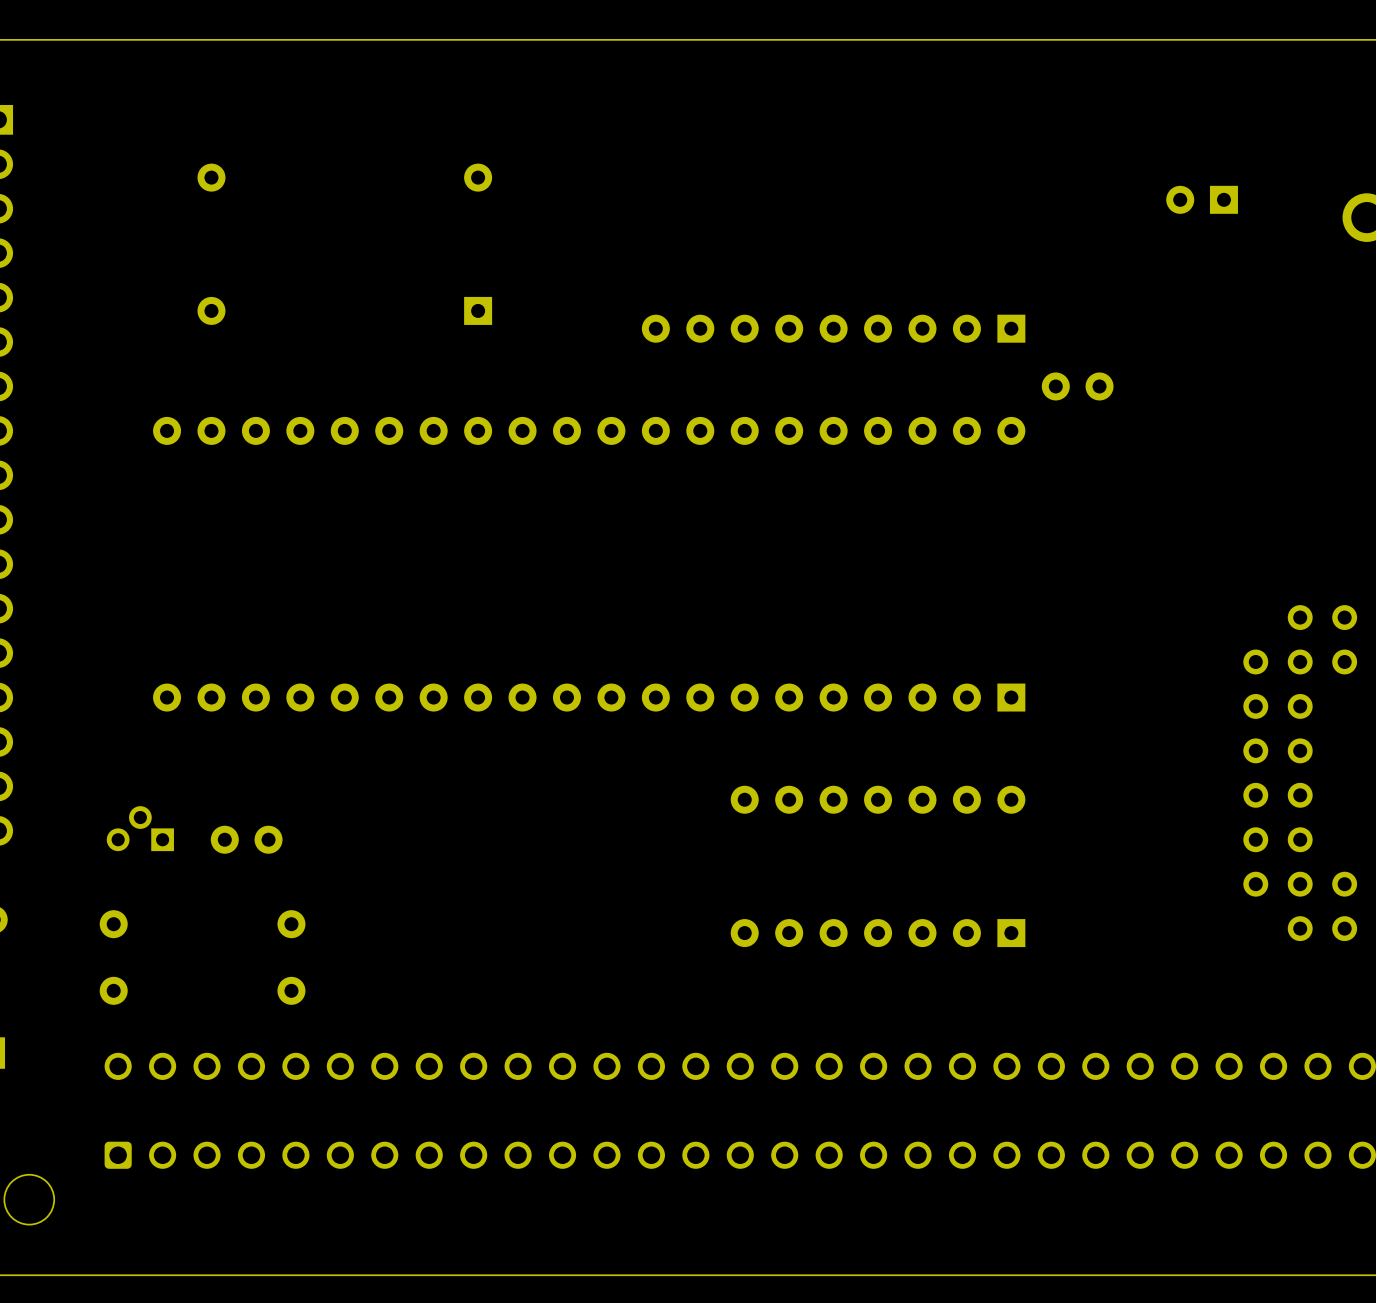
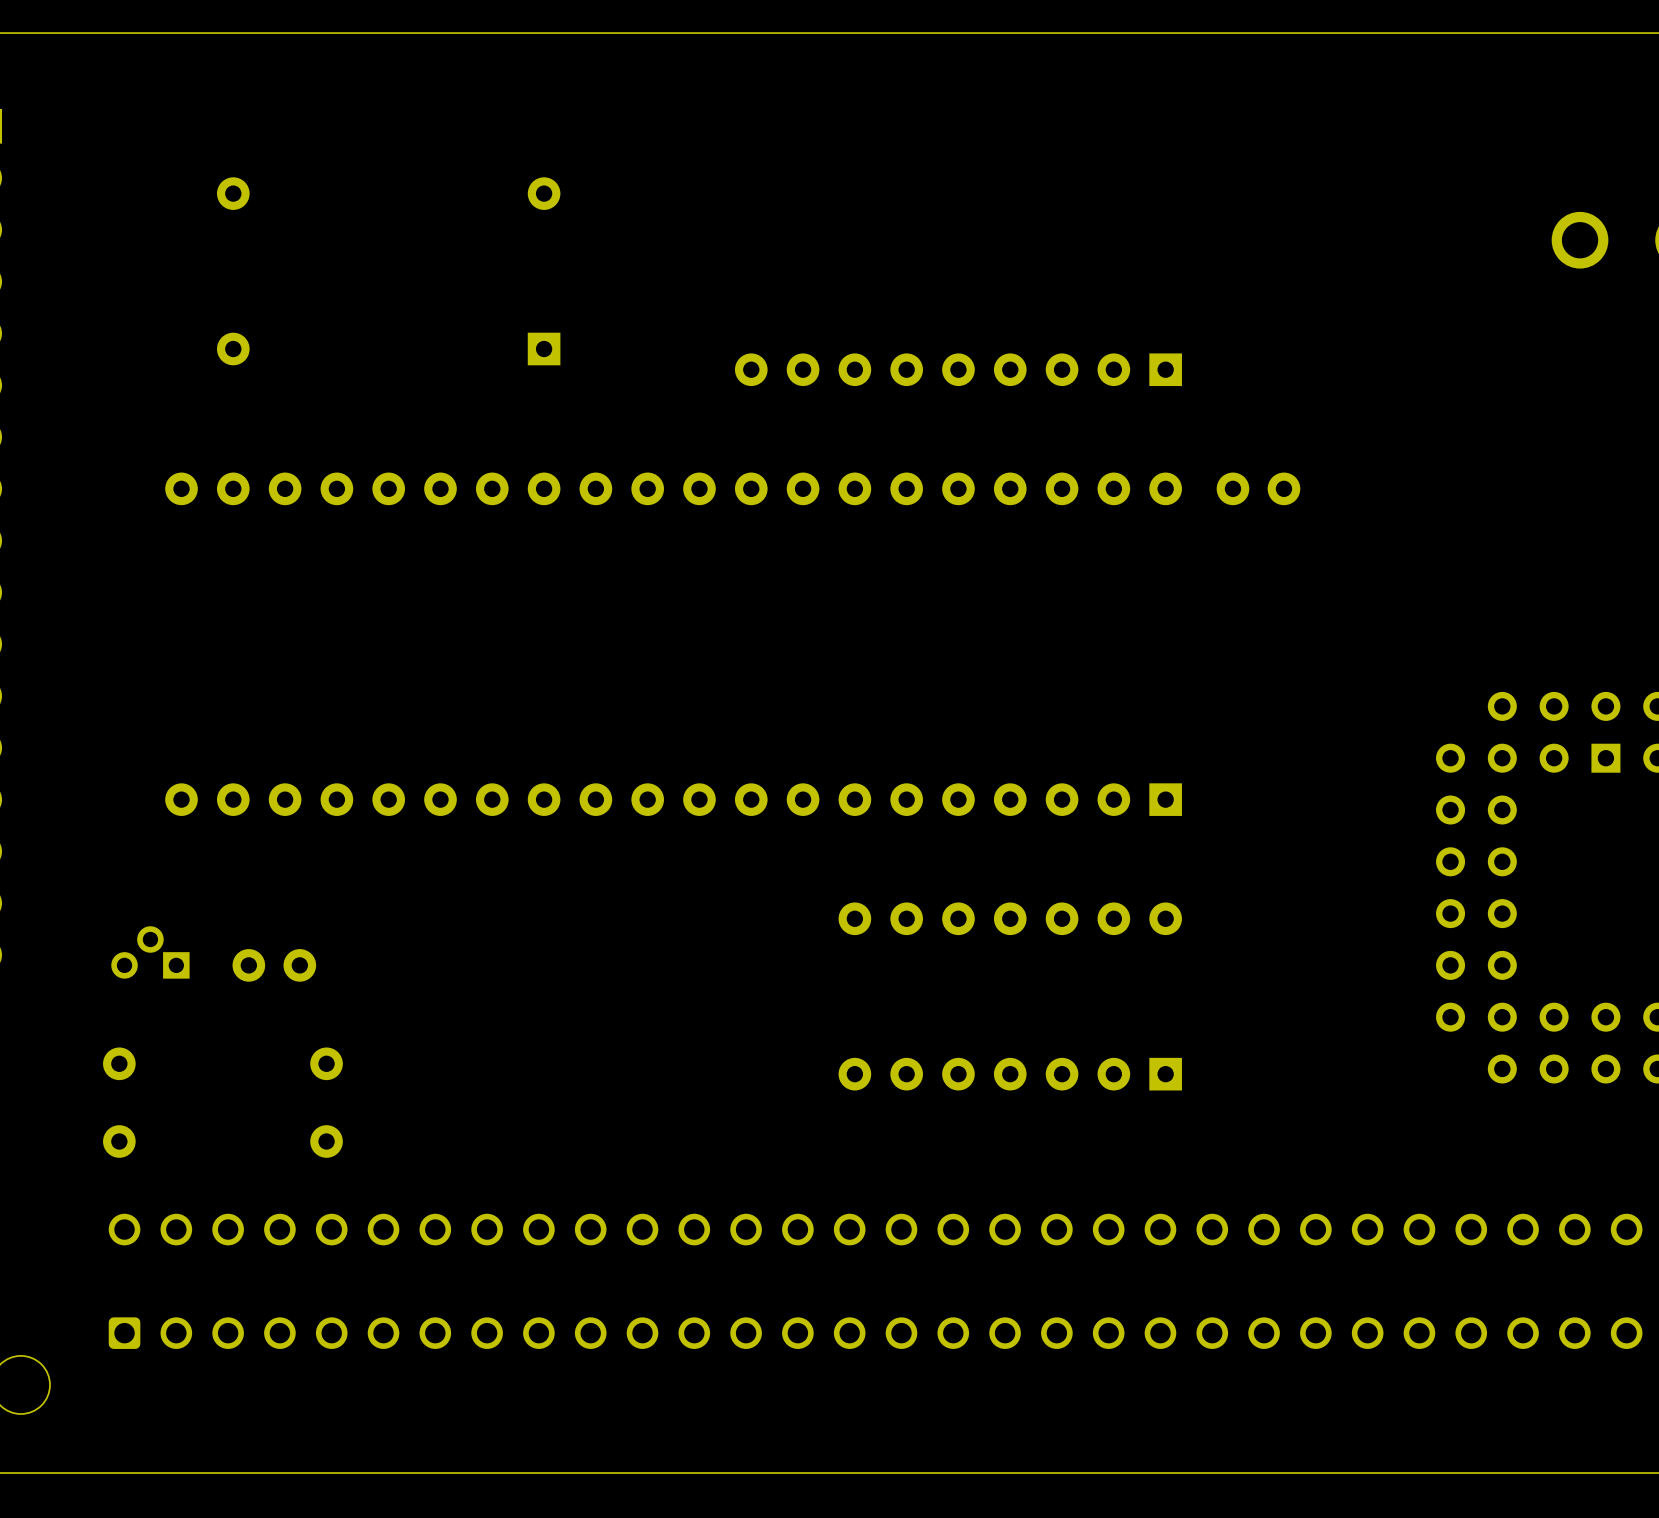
part: (1202, 199) -> none
part position: (1077, 386) -> (1258, 488)

